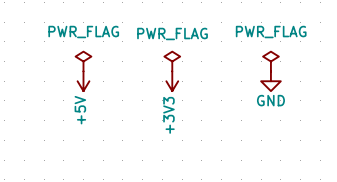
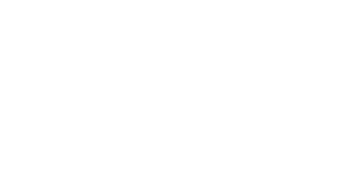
power symbol: PWR_FLAG (83, 61) -> none
power symbol: PWR_FLAG (172, 61) -> none
power symbol: PWR_FLAG (270, 61) -> none
power symbol: +5V (83, 81) -> none
power symbol: +3V3 (172, 81) -> none
power symbol: GND (270, 81) -> none

